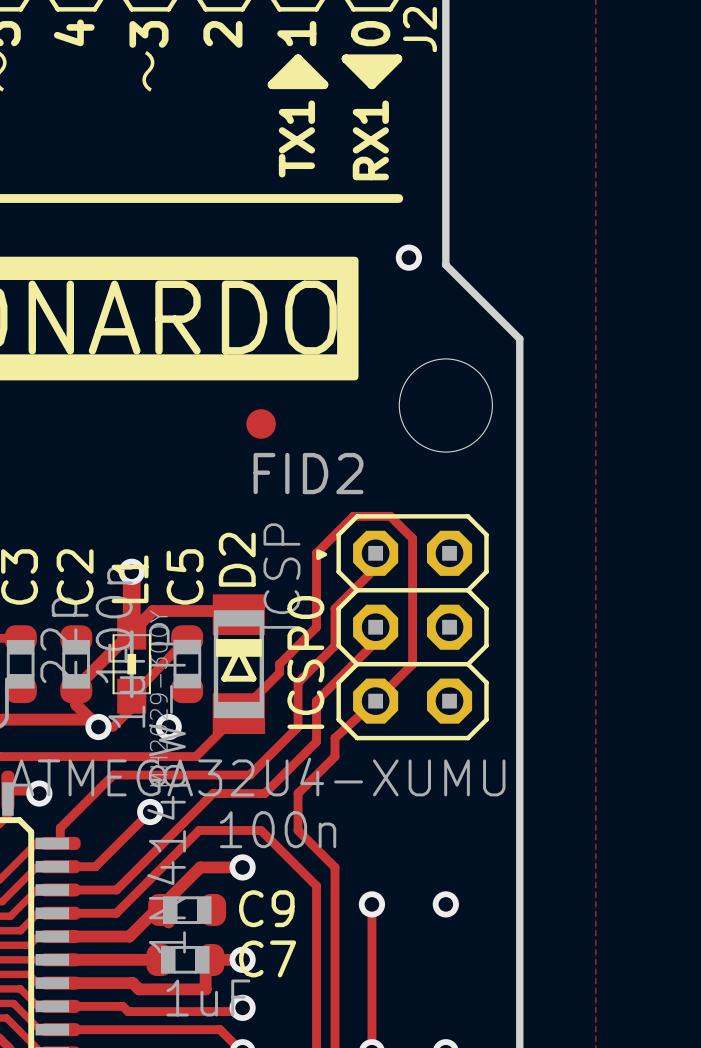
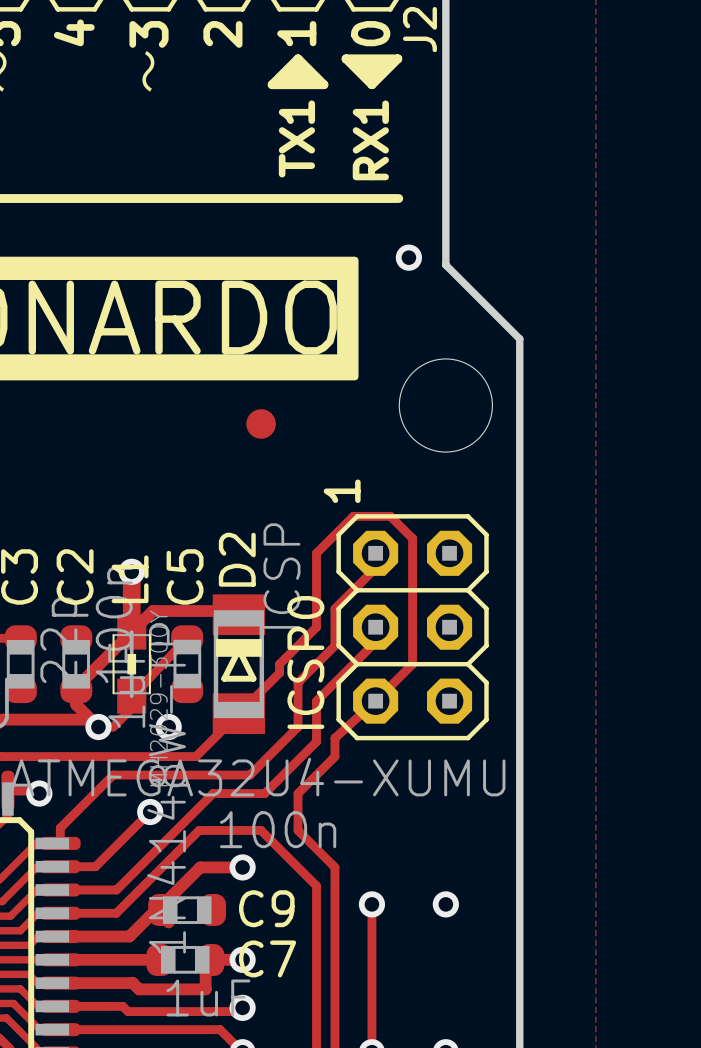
FID2 name: FID2 (308, 473) -> none
text: none -> 1 (342, 491)
ICSP0 footprint: [316, 514, 489, 741] -> [336, 514, 489, 741]

